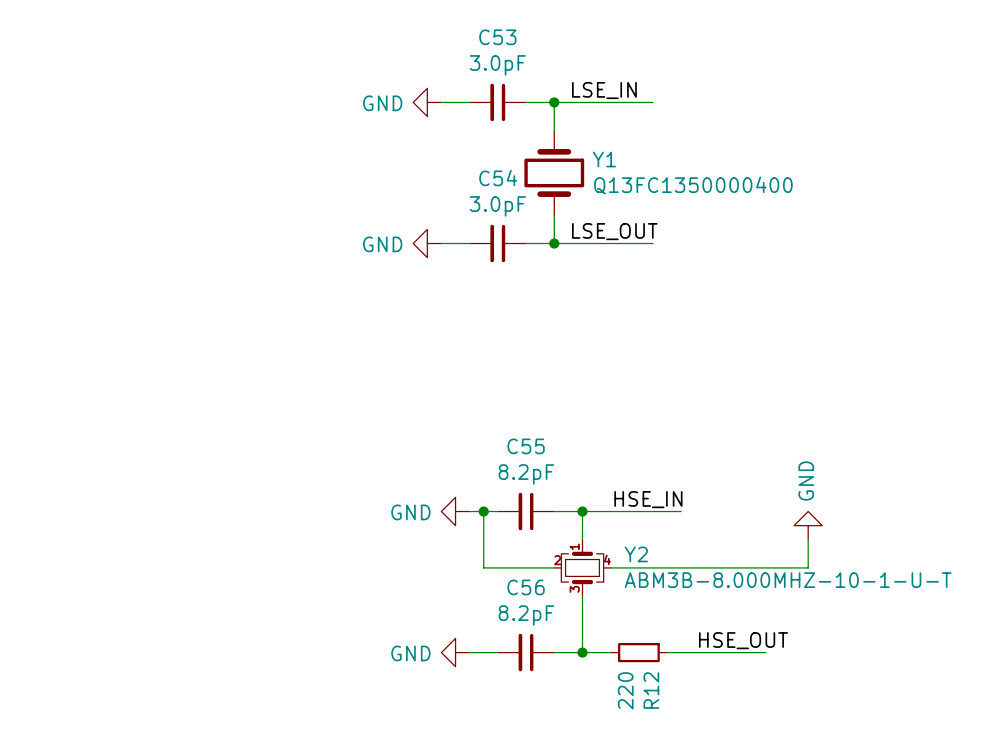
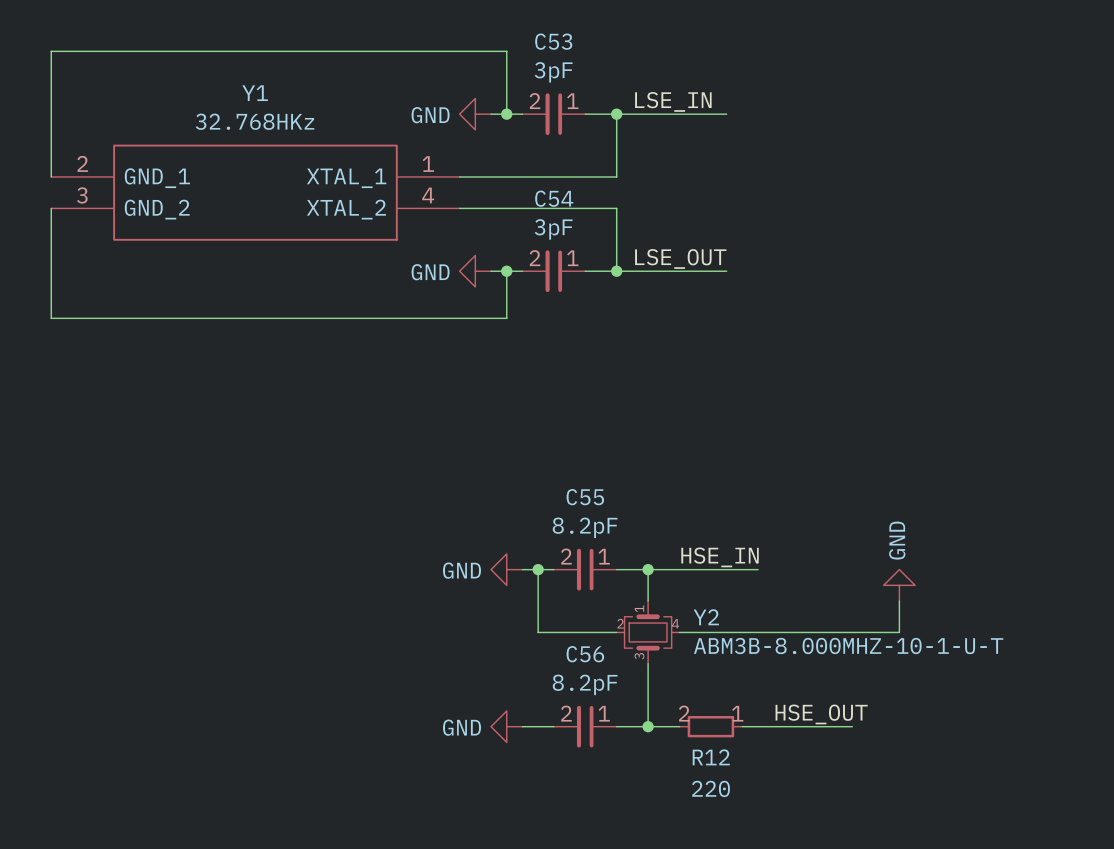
C53 value: 3.0pF (497, 65) -> 3pF (553, 72)
C53 pin number: none -> 2 (535, 101)
C53 pin number: none -> 1 (572, 101)
wire: none -> (506, 114) (506, 51) (51, 51) (51, 176)
junction: none -> (506, 114)
Y1 symbol: [524, 130, 585, 216] -> [51, 144, 460, 241]
wire: none -> (616, 145) (616, 176) (459, 176)
Y1 name position: Y1 (604, 159) -> Y1 (255, 93)
Y1 value: Q13FC1350000400 (693, 185) -> 32.768HKz (255, 121)
wire: none -> (51, 208) (51, 318) (506, 318) (506, 271)
wire: none -> (459, 208) (616, 208) (616, 239)
C54 value: 3.0pF (497, 206) -> 3pF (553, 229)
C54 pin number: none -> 2 (535, 258)
C54 pin number: none -> 1 (572, 258)
junction: none -> (506, 271)
C55 pin number: none -> 2 (566, 556)
C55 pin number: none -> 1 (604, 556)
C56 pin number: none -> 2 (566, 713)
C56 pin number: none -> 1 (604, 713)
R12 pin number: none -> 2 (684, 713)
R12 pin number: none -> 1 (737, 713)
R12 value rotation: 0° (625, 690) -> 90° clockwise (711, 788)
R12 name rotation: 0° (651, 690) -> 90° clockwise (711, 757)

